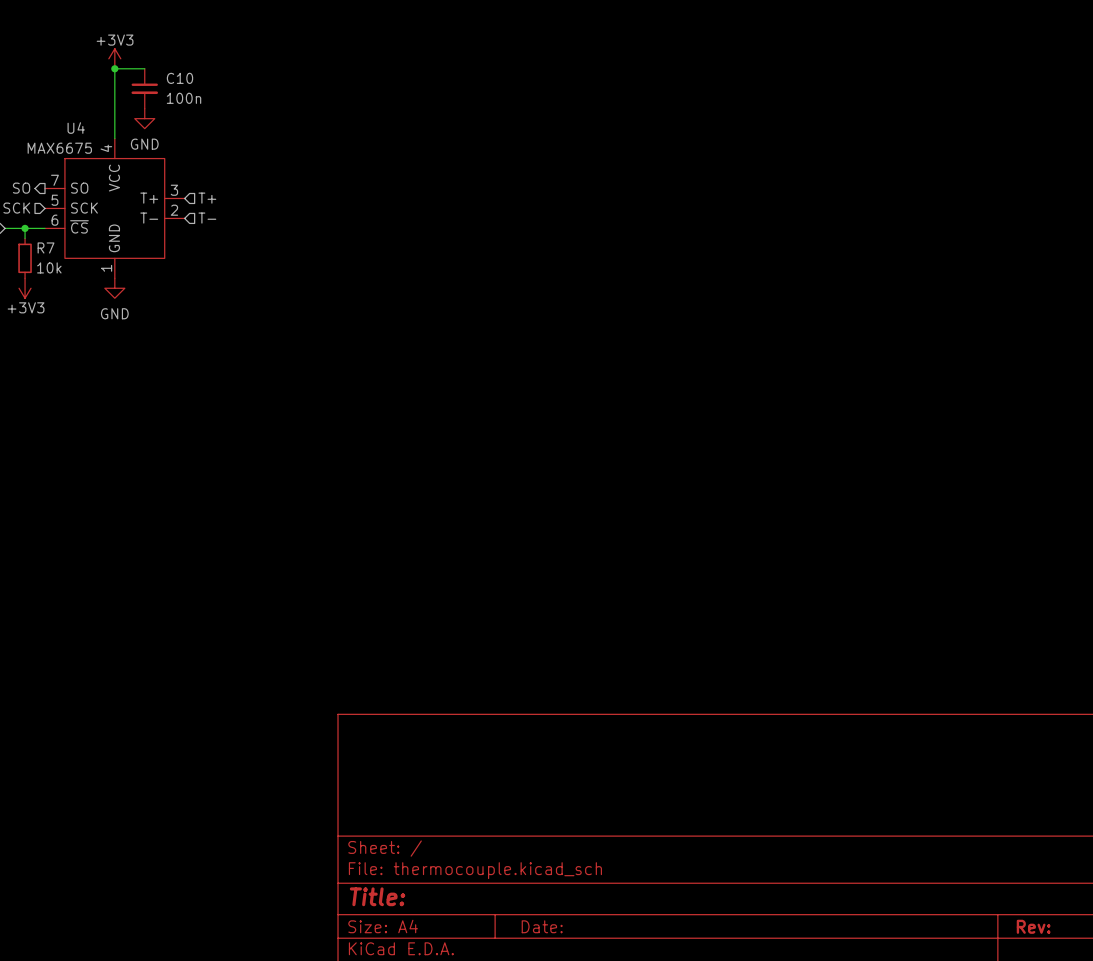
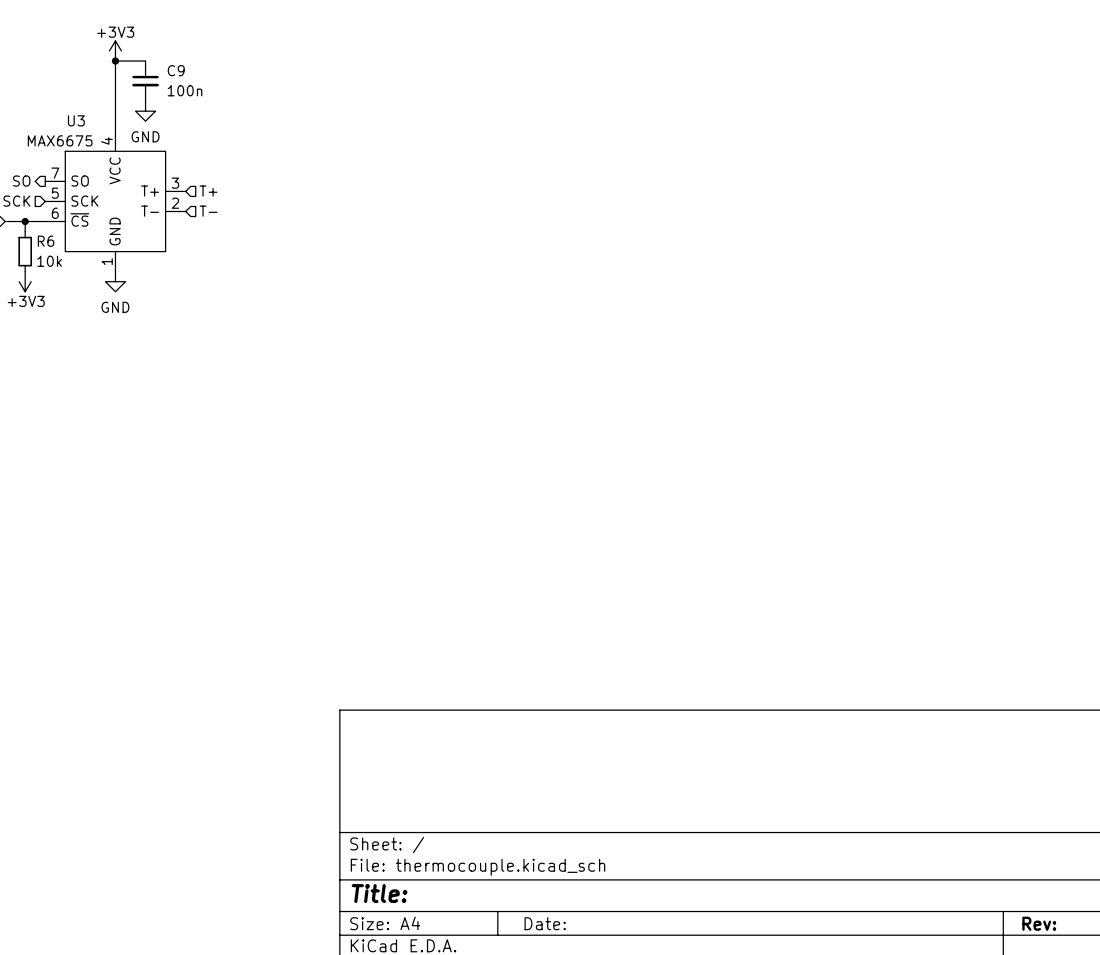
C10 name: C10 (179, 78) -> C9 (176, 70)
U4 name: U4 (76, 128) -> U3 (76, 120)
R7 name: R7 (46, 247) -> R6 (46, 241)

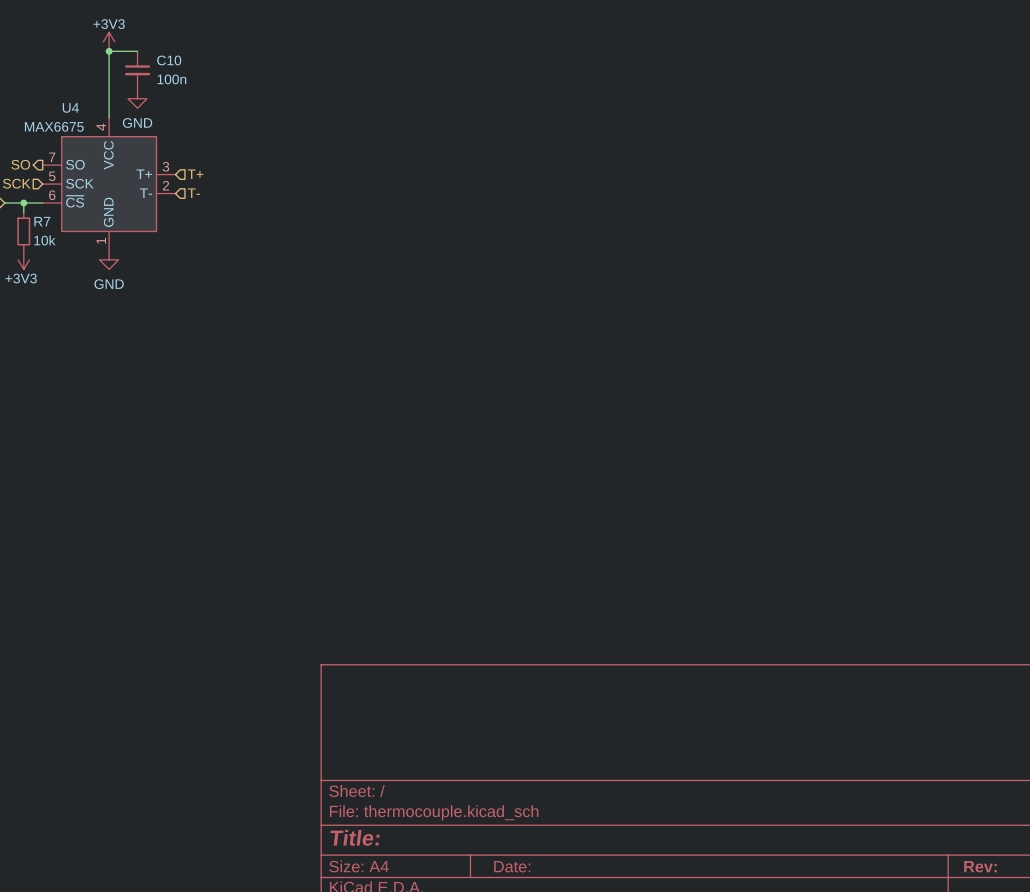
C9 name: C9 (176, 70) -> C10 (169, 60)
U3 name: U3 (76, 120) -> U4 (70, 107)
R6 name: R6 (46, 241) -> R7 (42, 221)

